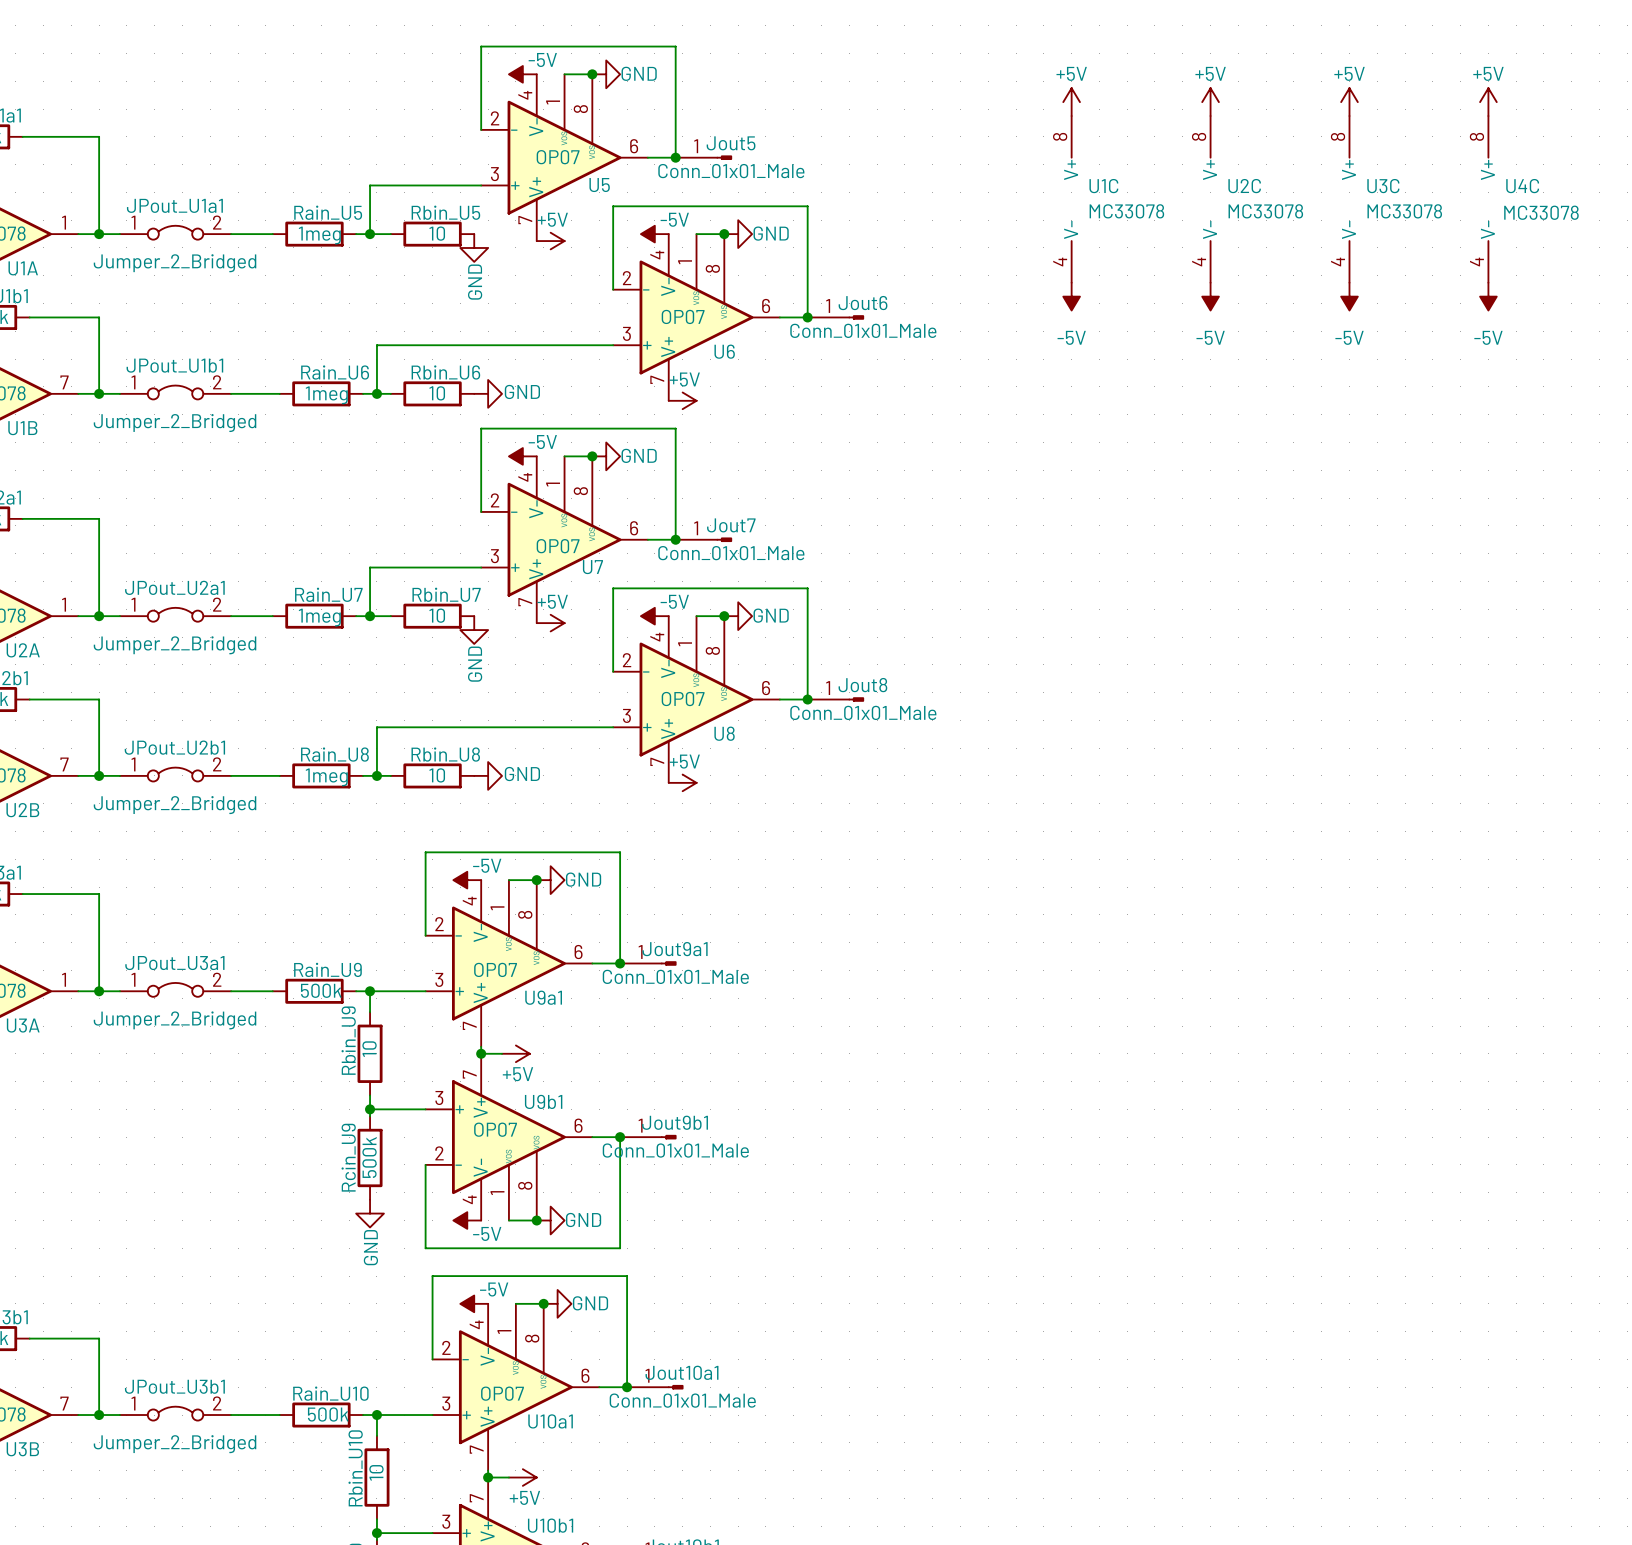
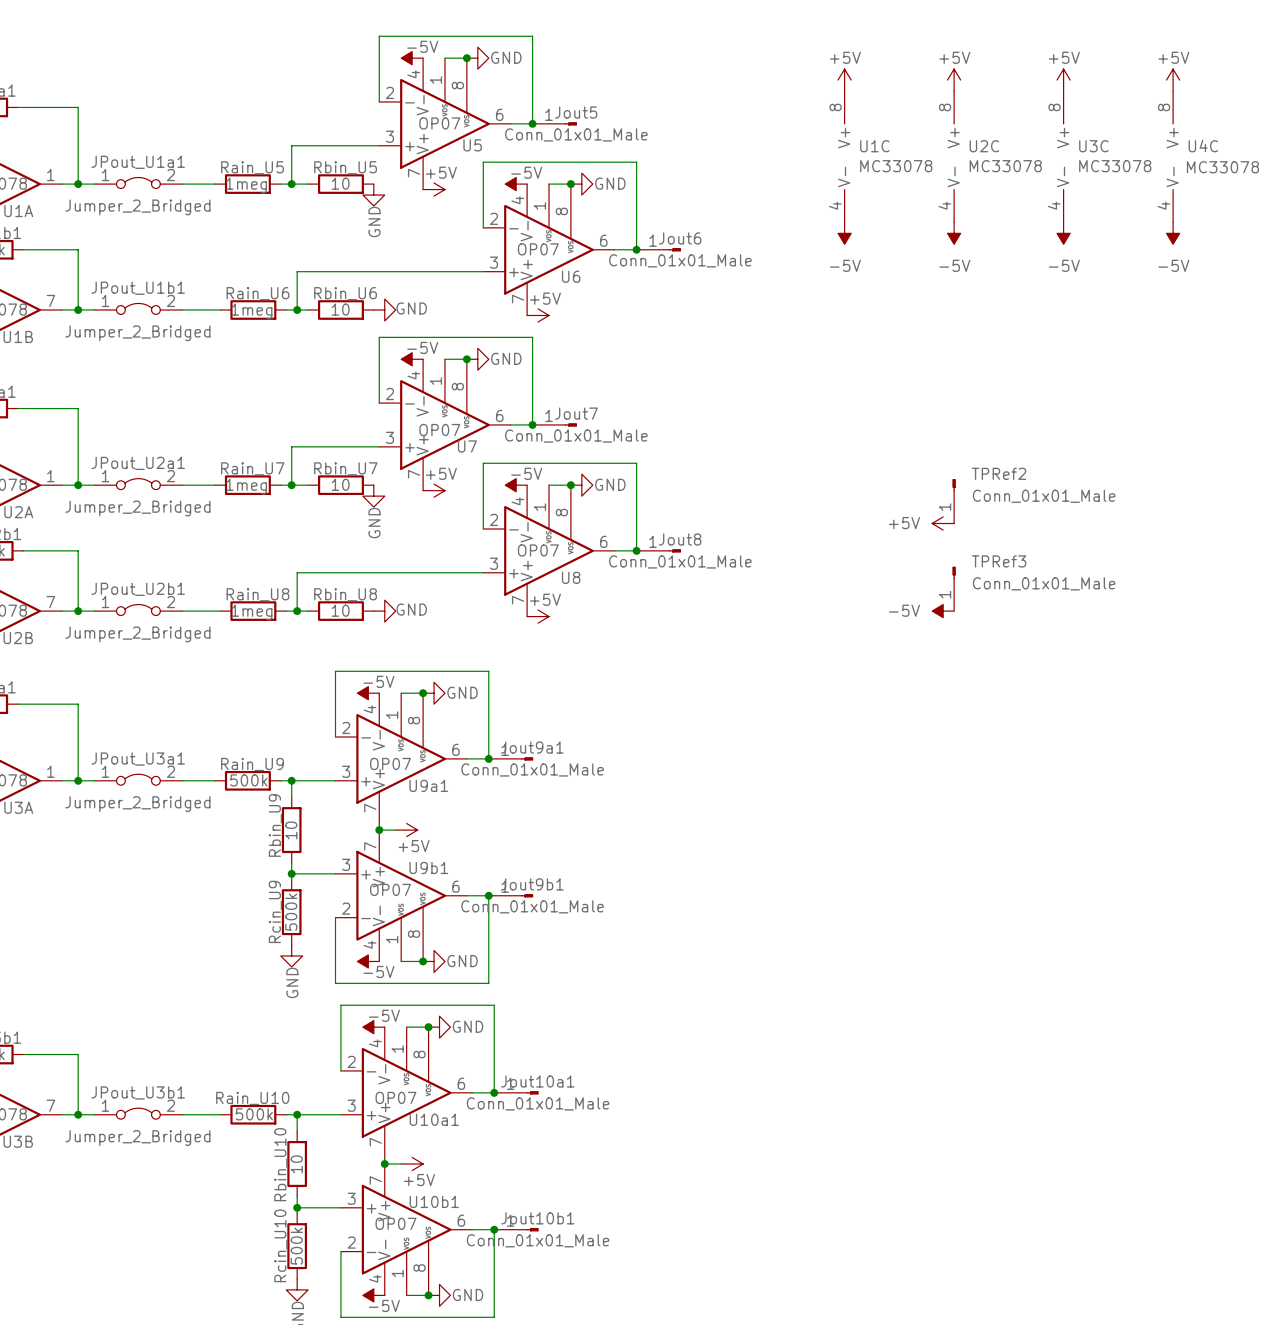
TPRef2: none -> Conn_01x01_Male (954, 501)
power symbol: none -> +5V (943, 523)
TPRef3: none -> Conn_01x01_Male (954, 588)
power symbol: none -> -5V (943, 611)

